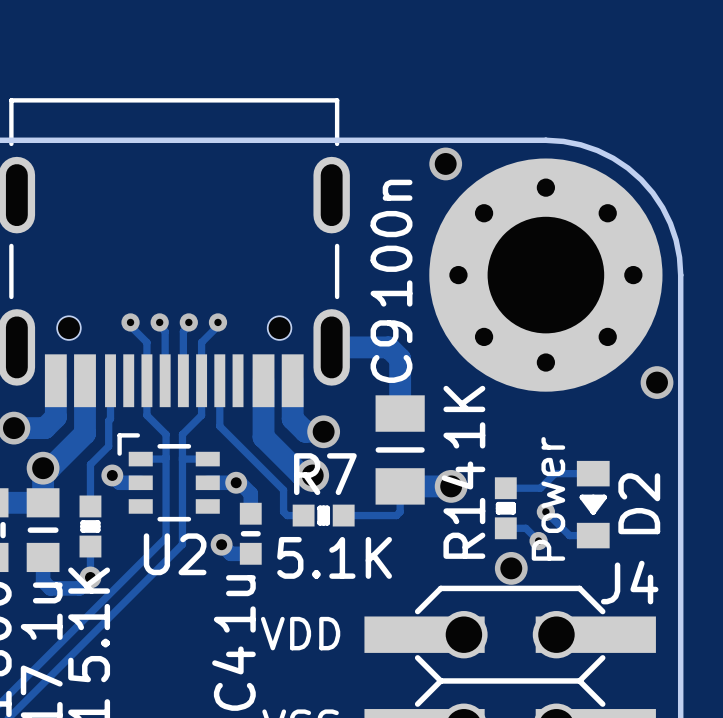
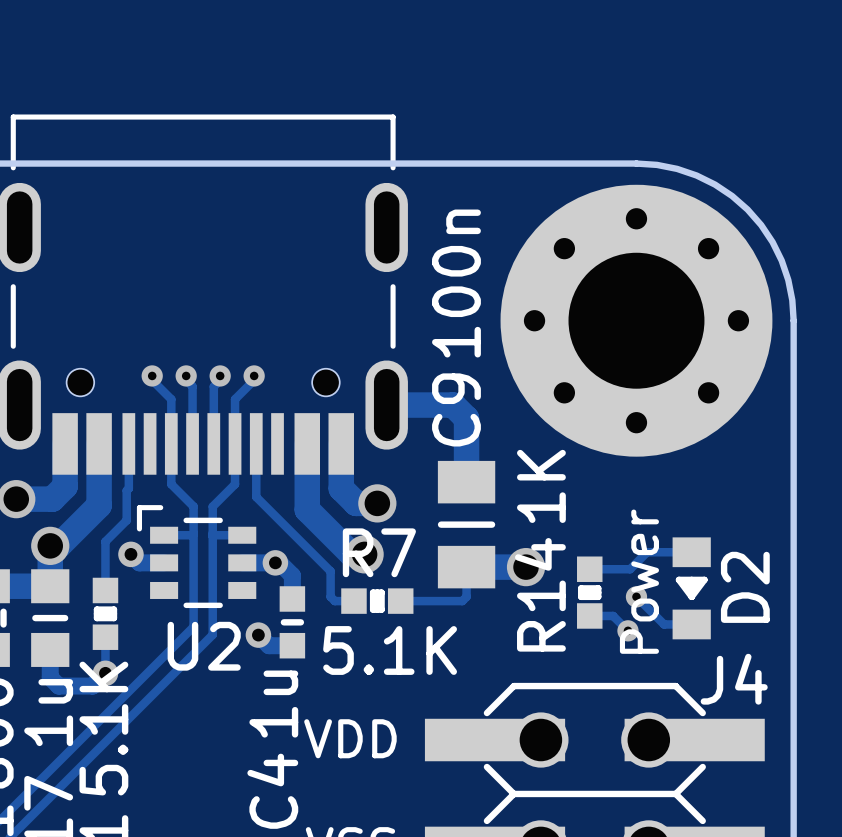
via: (445, 163) -> none
via: (657, 382) -> none
via: (511, 568) -> none

